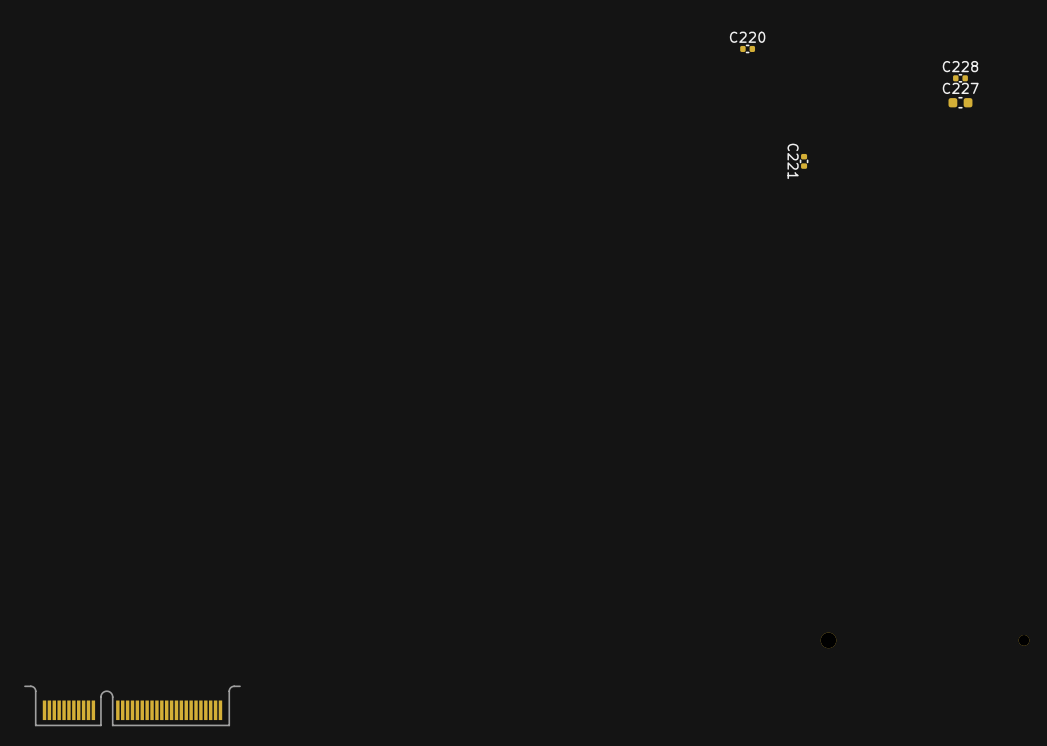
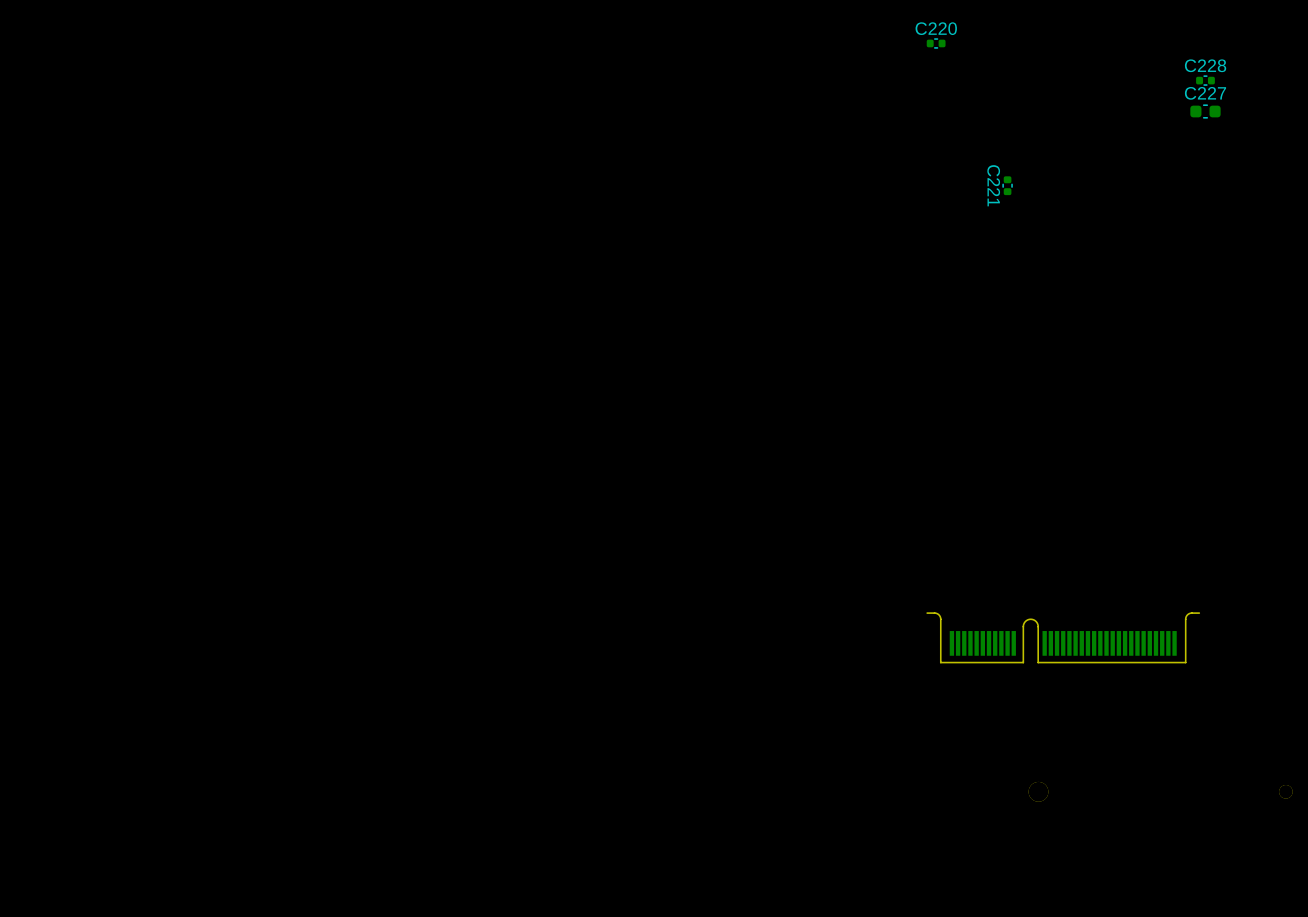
part: none -> (1063, 637)
part: (132, 705) -> none

